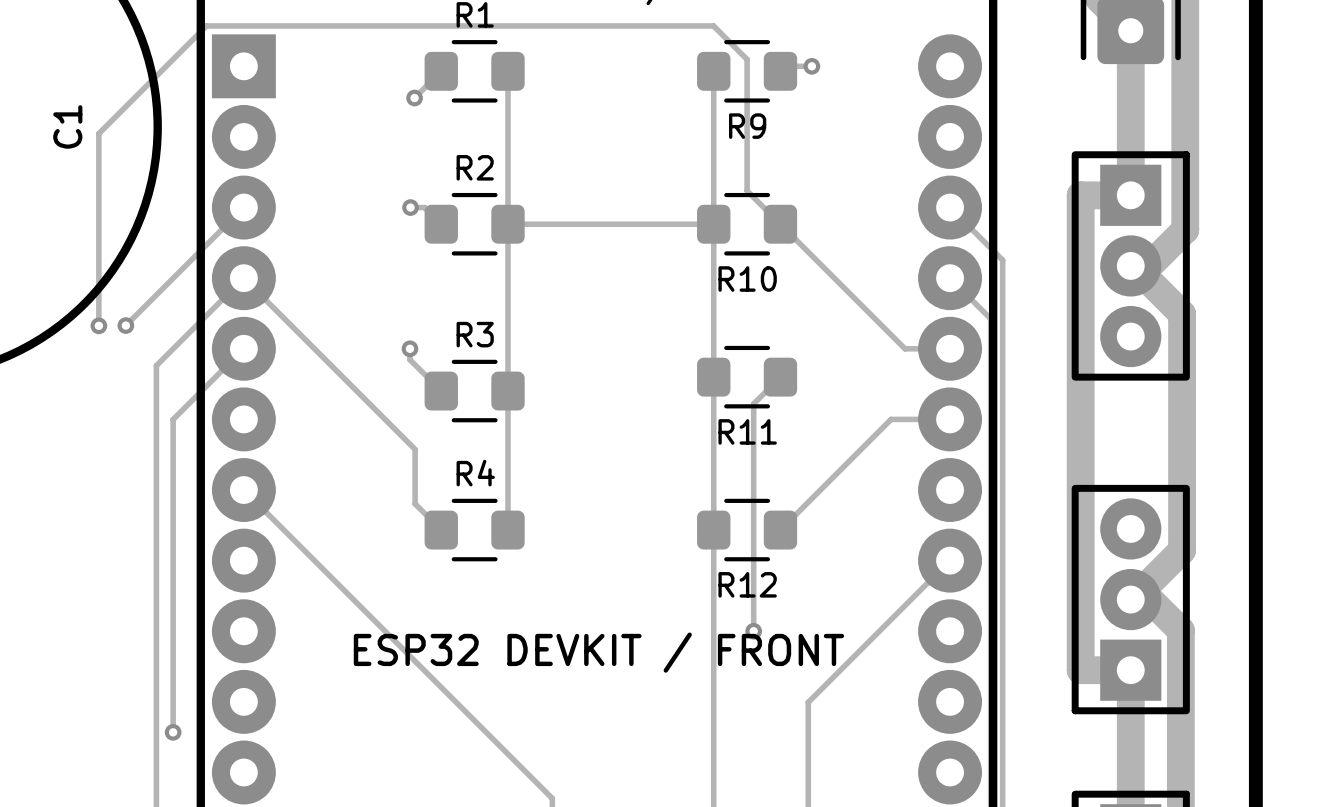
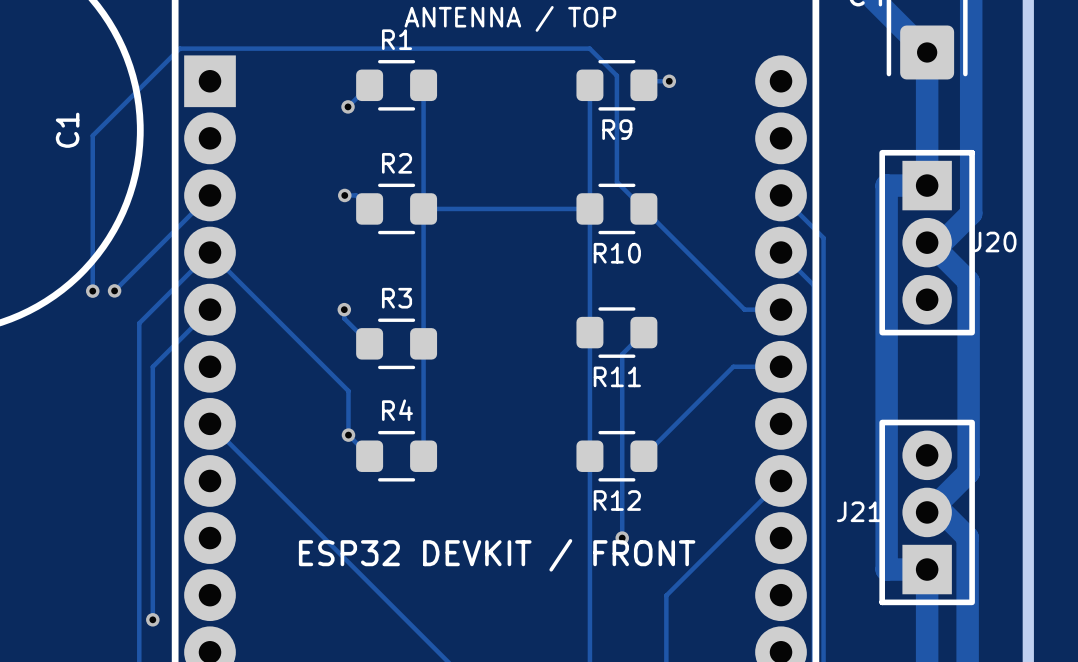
J20 name: none -> J20 (994, 242)
via: none -> (348, 435)
J21 name: none -> J21 (859, 511)

